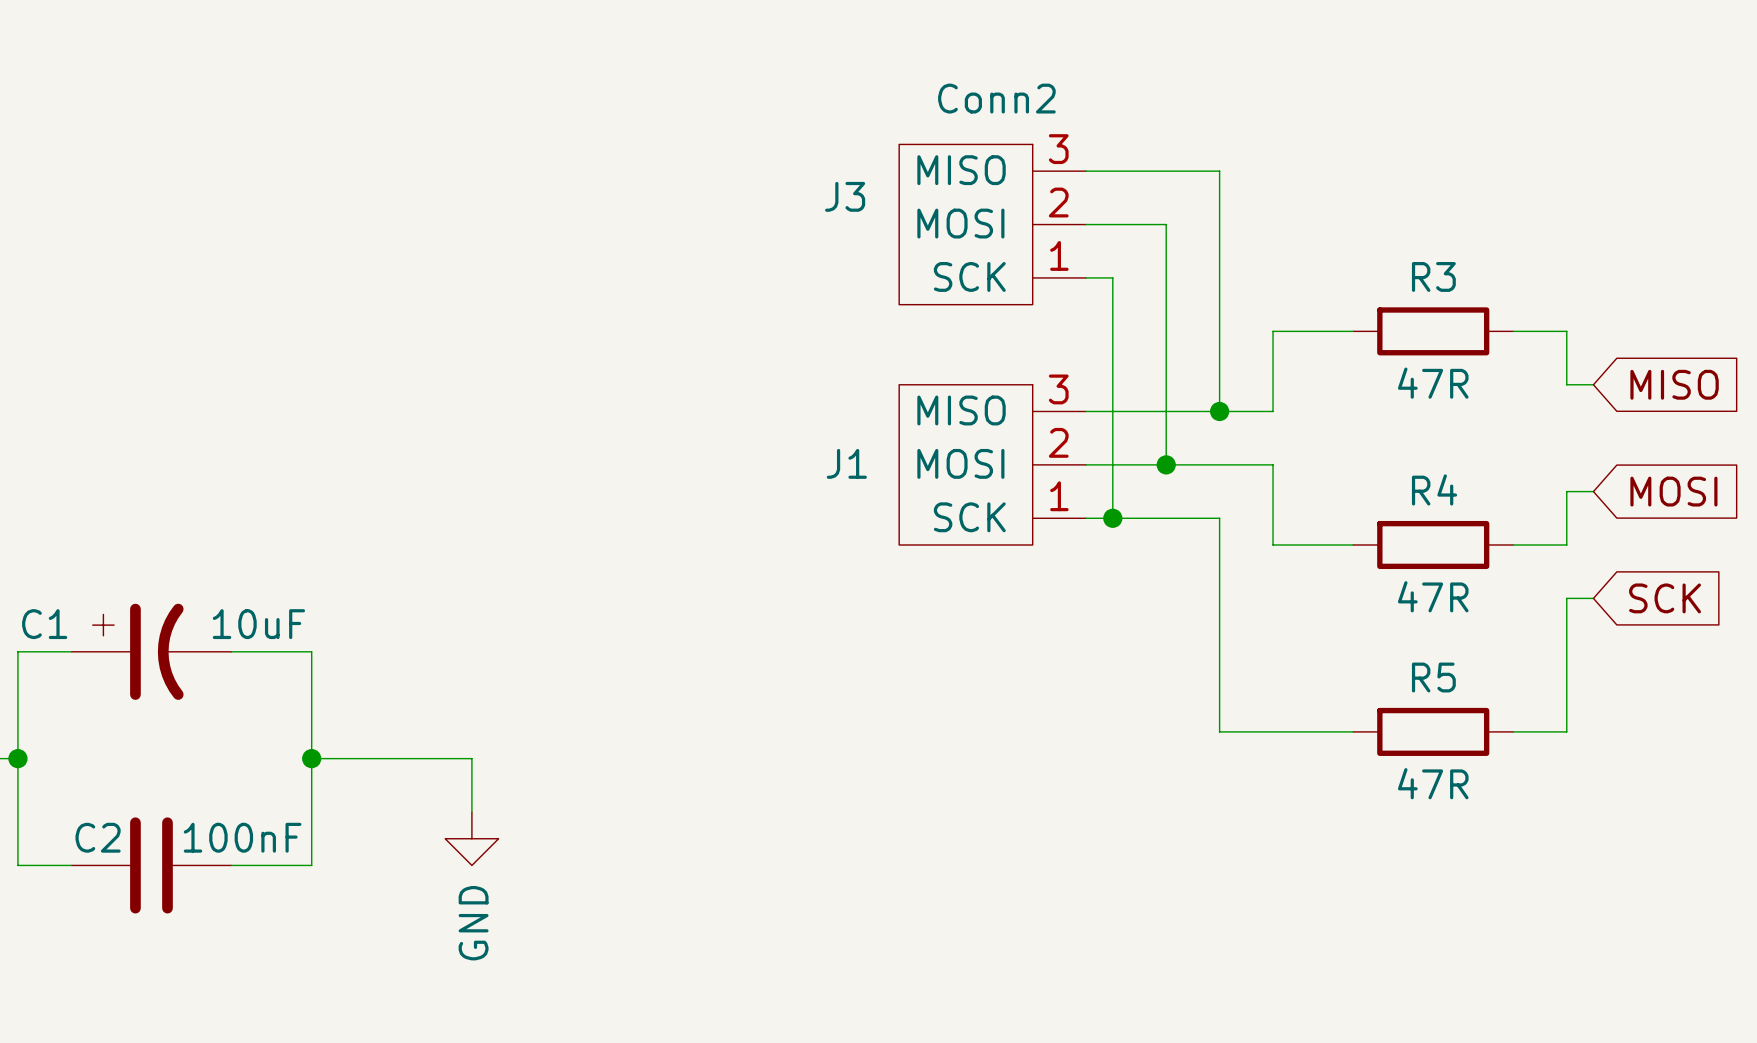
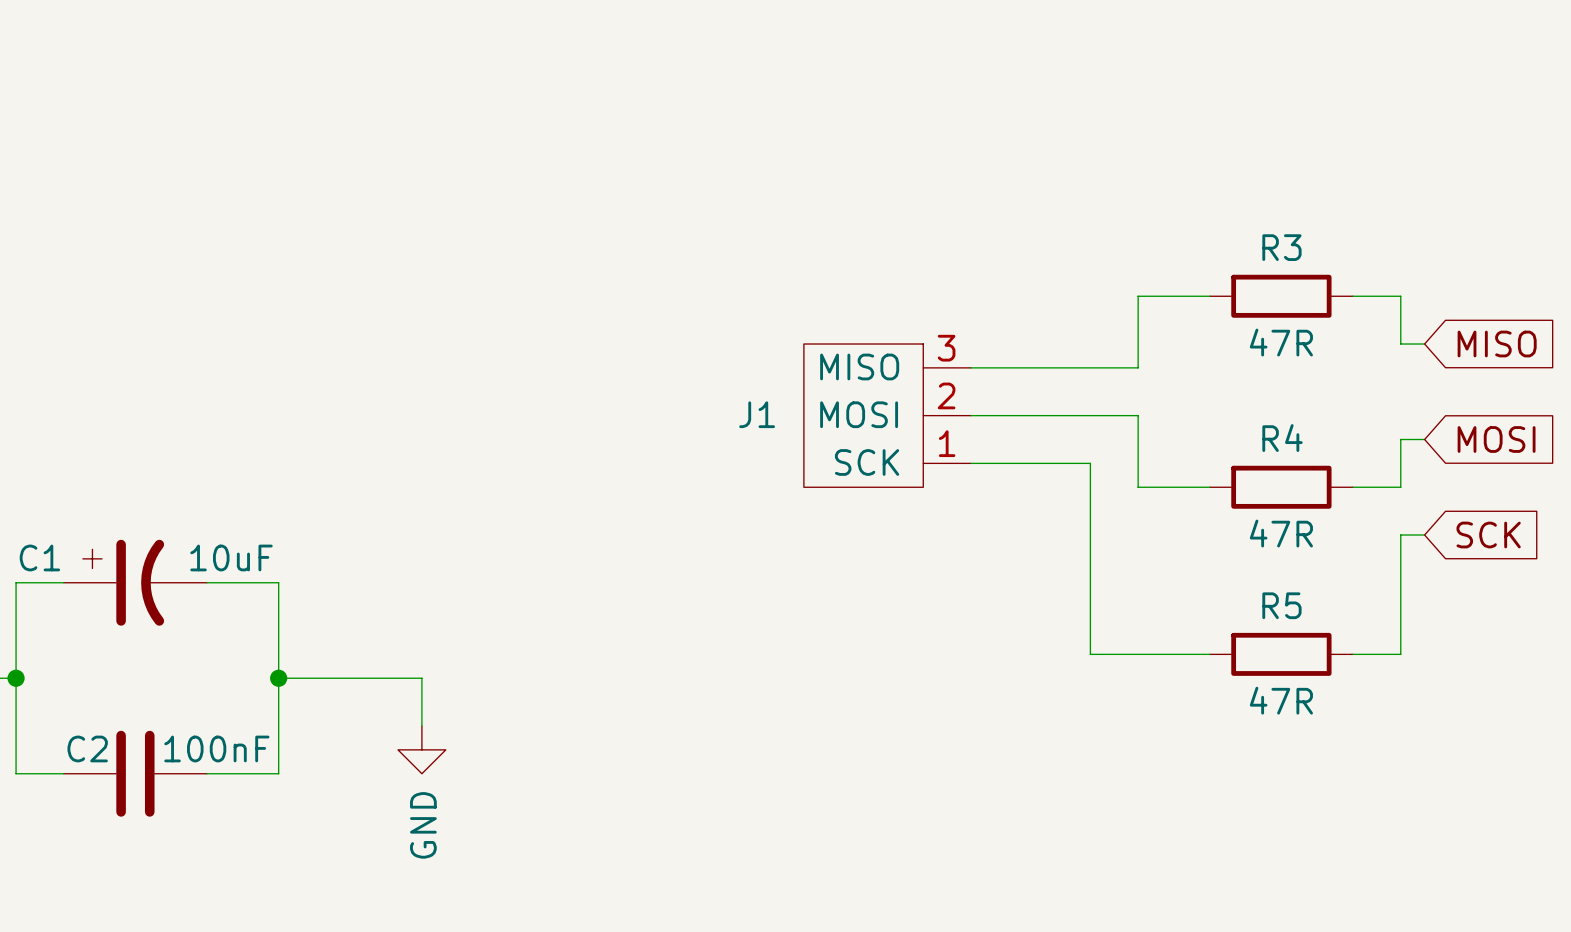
wire: (1086, 171) (1219, 171) (1219, 411) -> none
J3: Conn2 (992, 224) -> none
wire: (1086, 224) (1166, 224) (1166, 464) -> none
wire: (1086, 277) (1112, 277) (1112, 518) -> none
junction: (1219, 411) -> none
junction: (1166, 464) -> none
junction: (1112, 518) -> none

